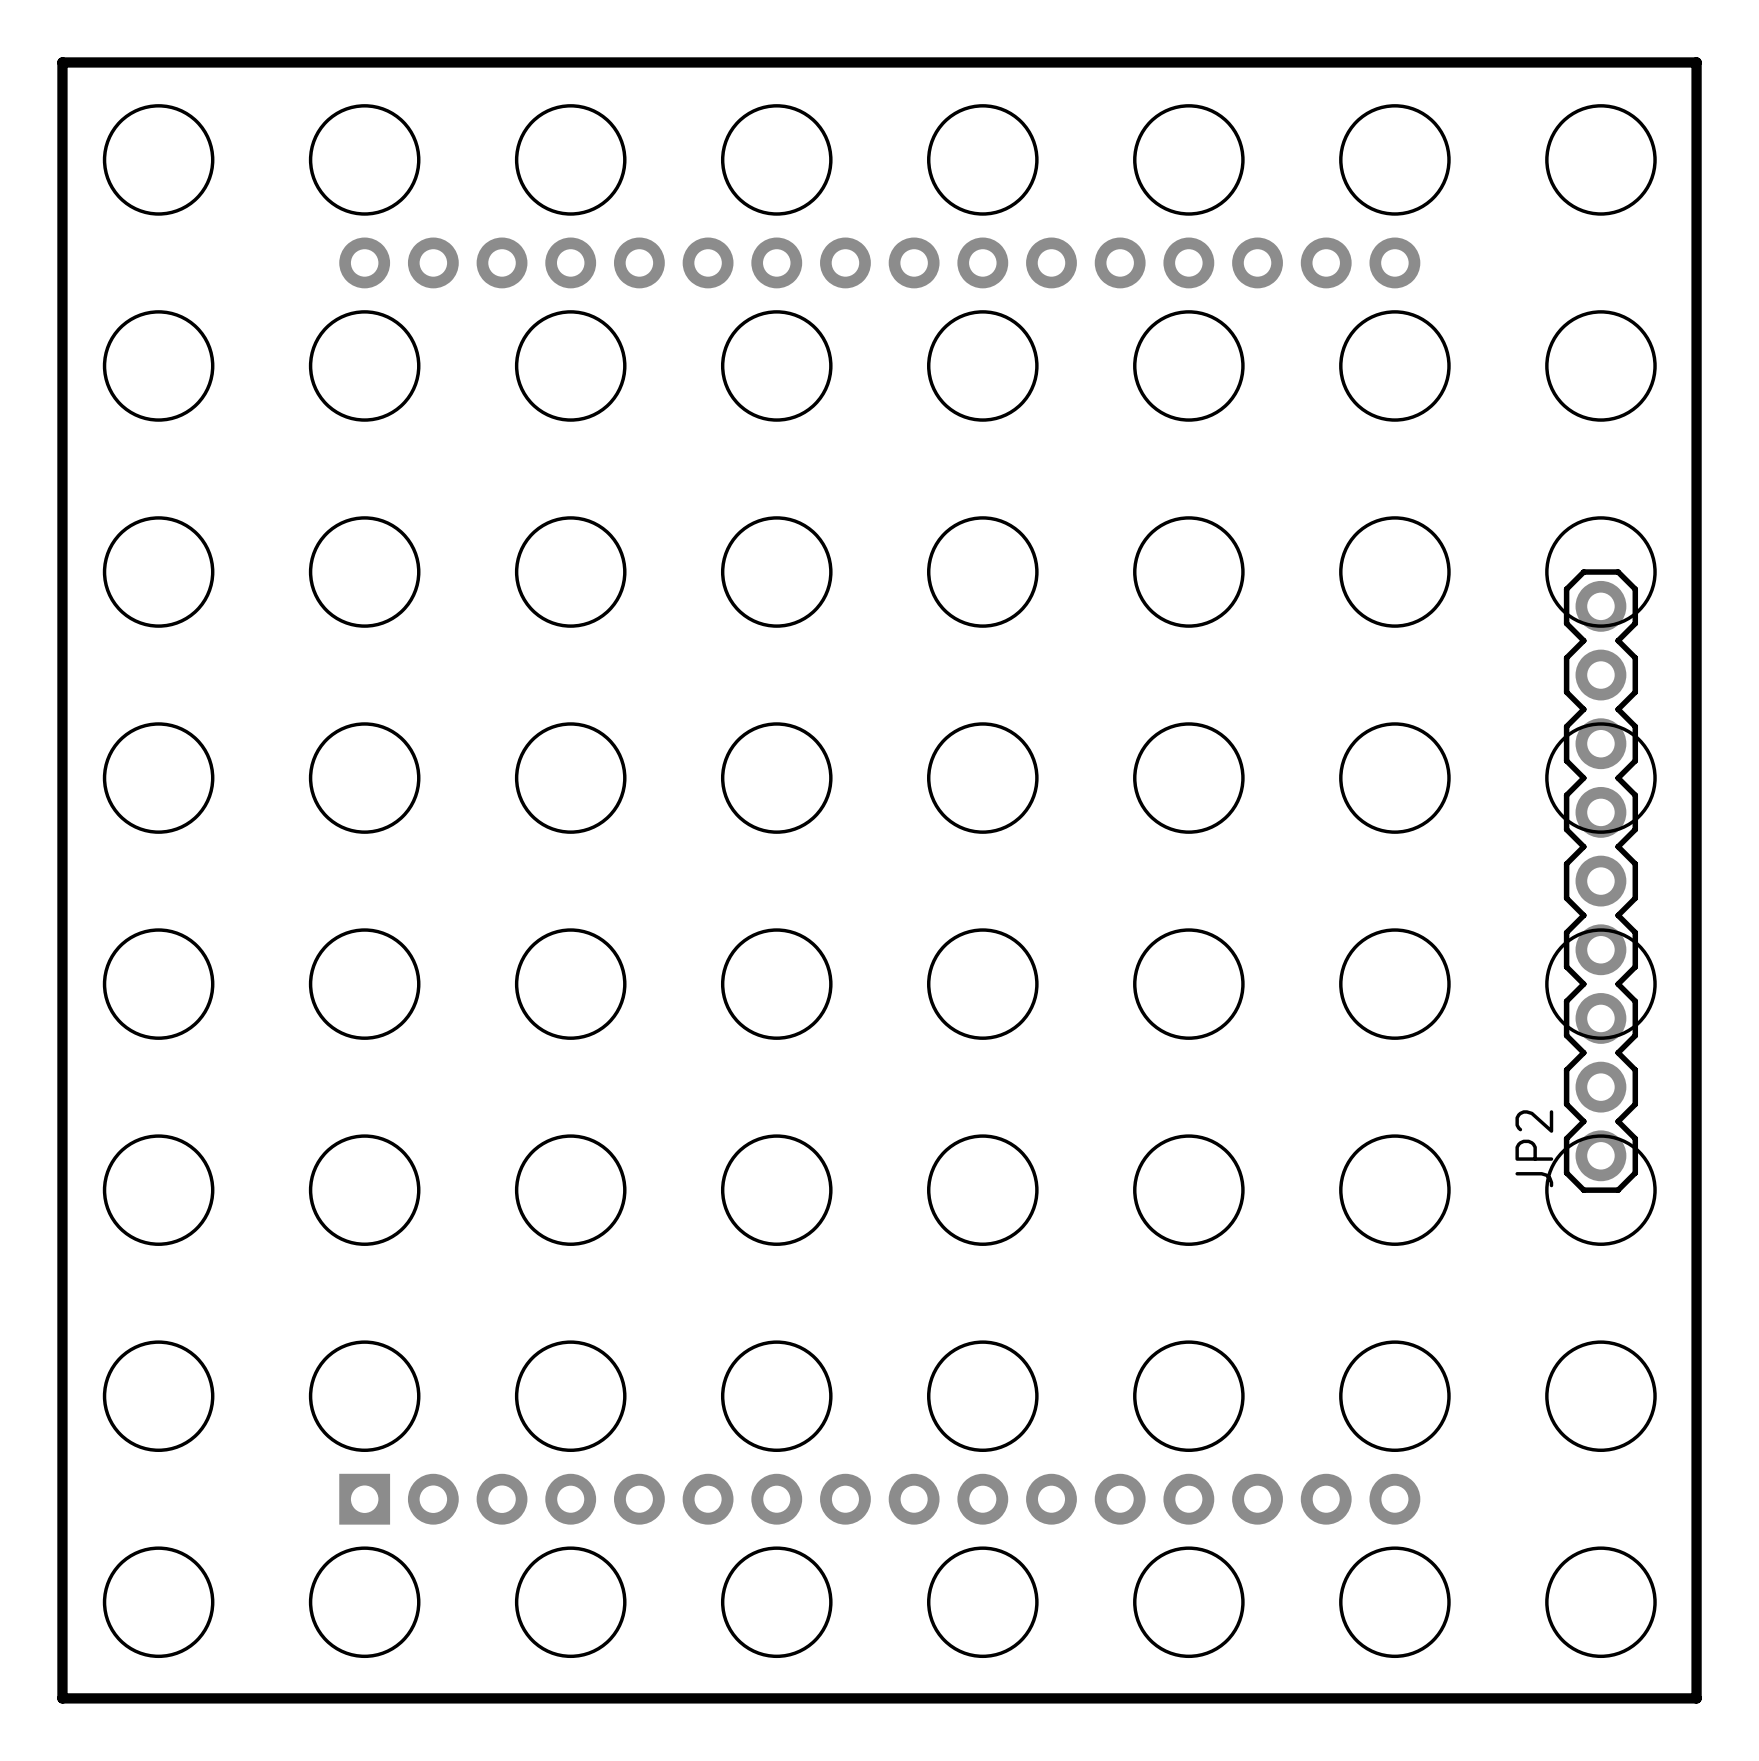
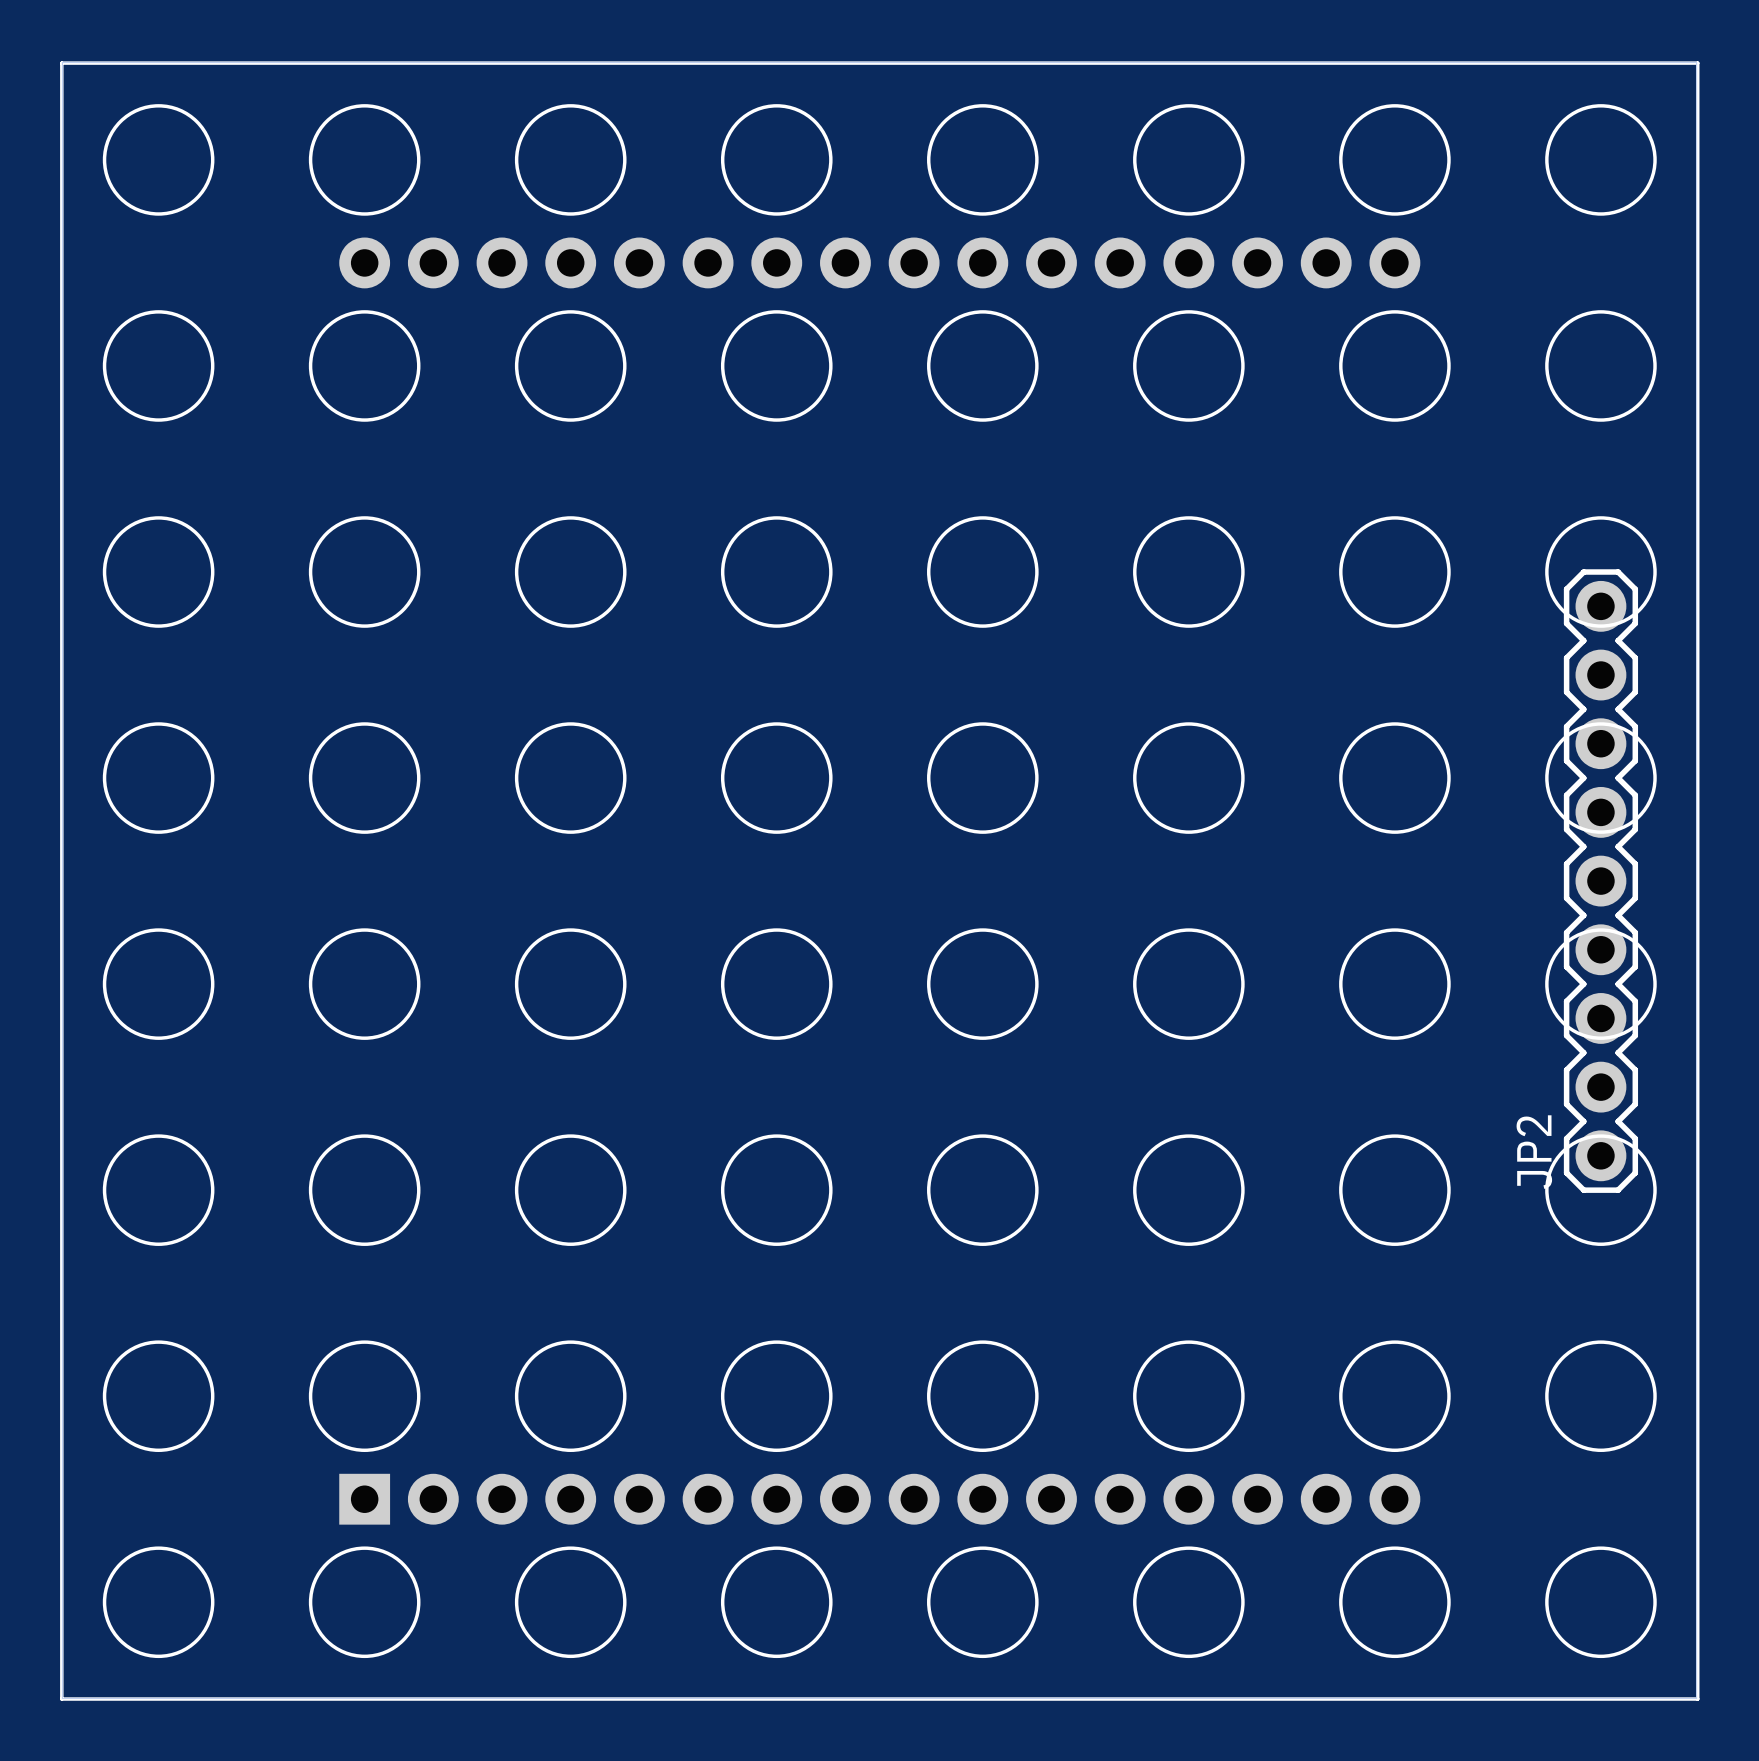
board edge width: thick (62, 62) (1696, 62) (1696, 1698) (62, 1698) (62, 62) -> thin (62, 62) (1696, 62) (1696, 1698) (62, 1698) (62, 62)

